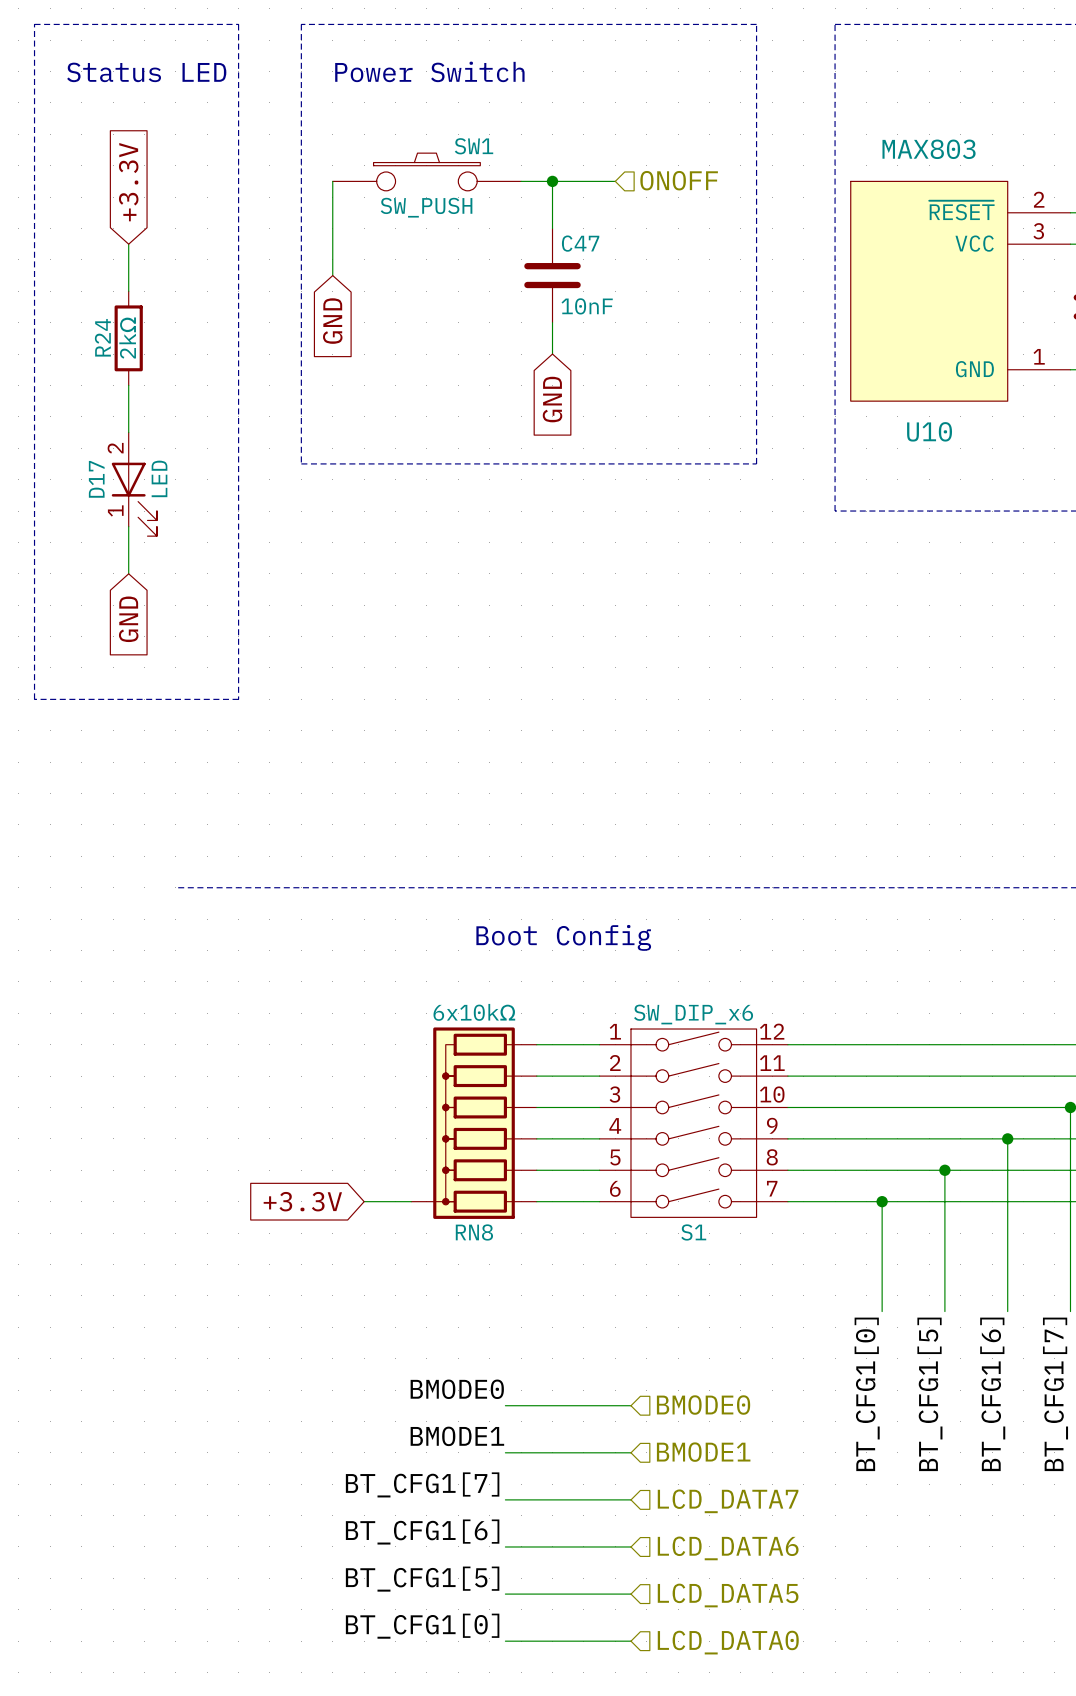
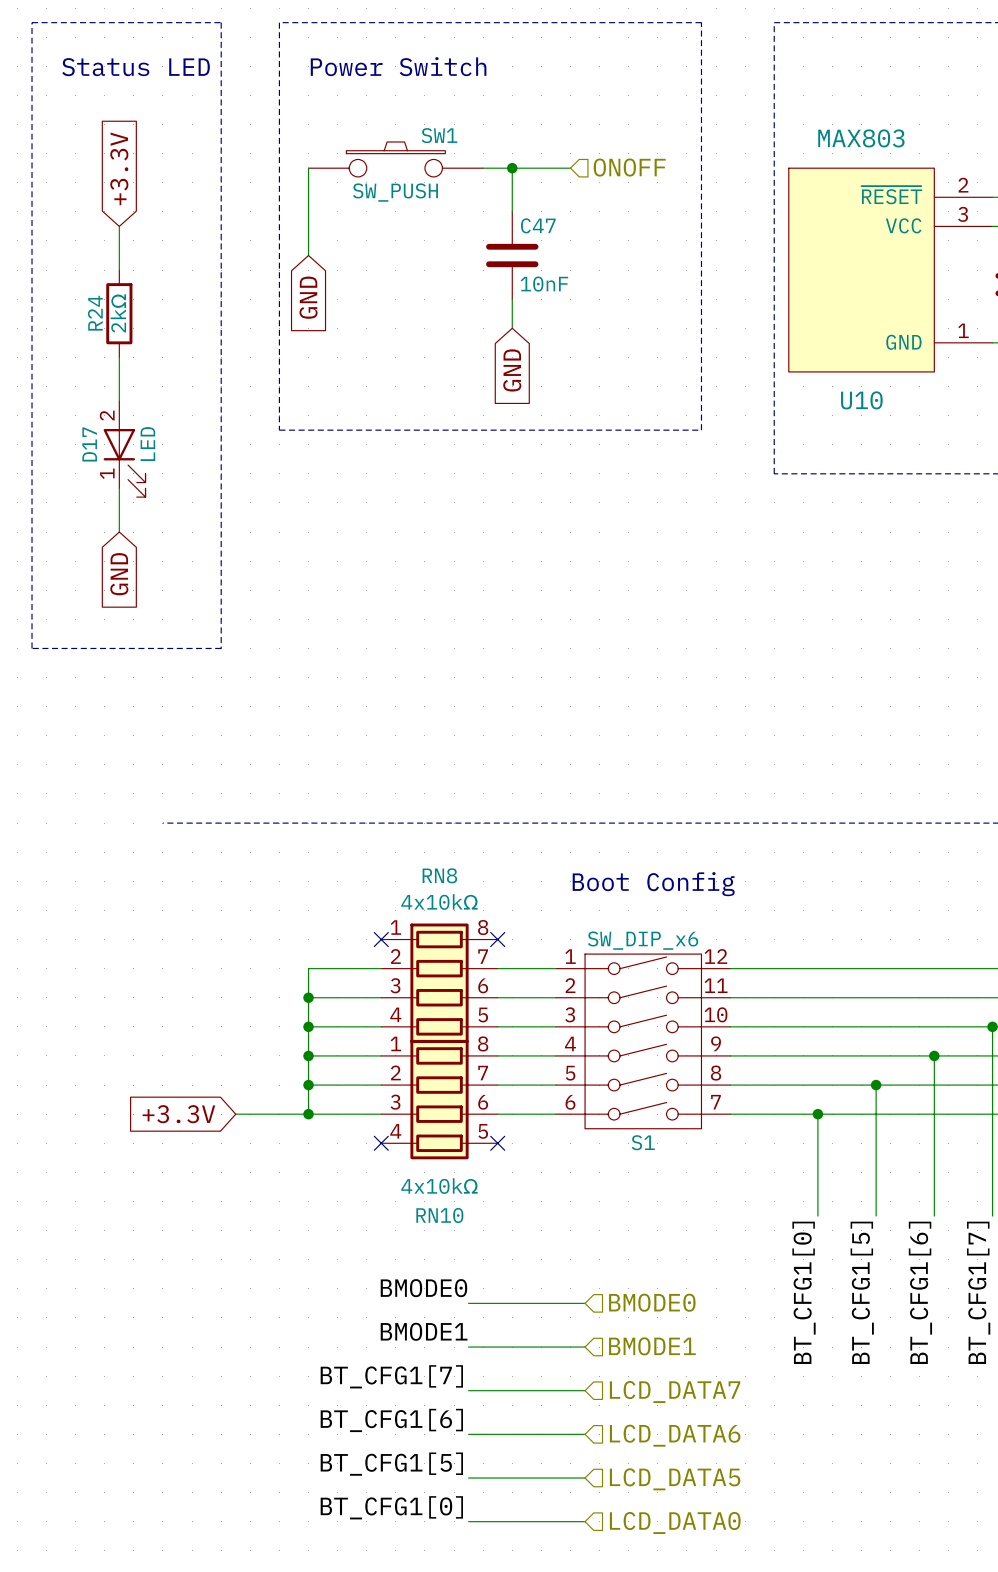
text position: Boot Config (563, 937) -> Boot Config (653, 884)
RN8 value: 6x10kΩ (474, 1012) -> 4x10kΩ (439, 902)
no-connect mark: none -> (381, 939)
no-connect mark: none -> (497, 939)
RN8 symbol: [411, 1027, 537, 1219] -> [381, 923, 498, 1043]
wire: none -> (381, 968) (308, 968) (308, 1114)
wire: none -> (308, 997) (381, 997)
junction: none -> (308, 997)
wire: none -> (308, 1026) (381, 1026)
junction: none -> (308, 1026)
wire: none -> (308, 1055) (381, 1055)
junction: none -> (308, 1055)
wire: none -> (308, 1085) (381, 1085)
junction: none -> (308, 1085)
RN10: none -> 4x10kΩ (439, 1099)
wire: none -> (235, 1114) (337, 1114)
global label position: +3.3V (302, 1201) -> +3.3V (178, 1114)
junction: none -> (308, 1114)
RN8 name position: RN8 (474, 1232) -> RN8 (439, 875)
no-connect mark: none -> (381, 1143)
no-connect mark: none -> (497, 1143)

